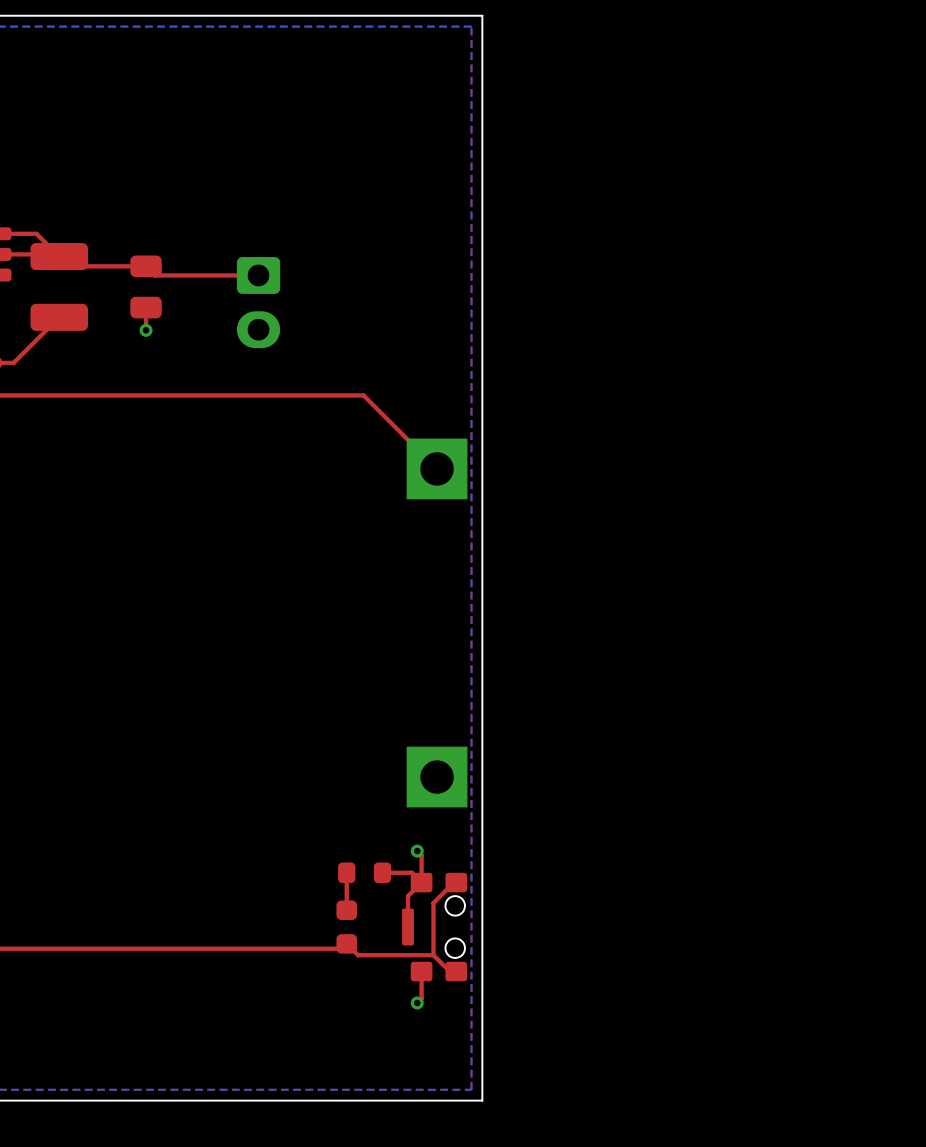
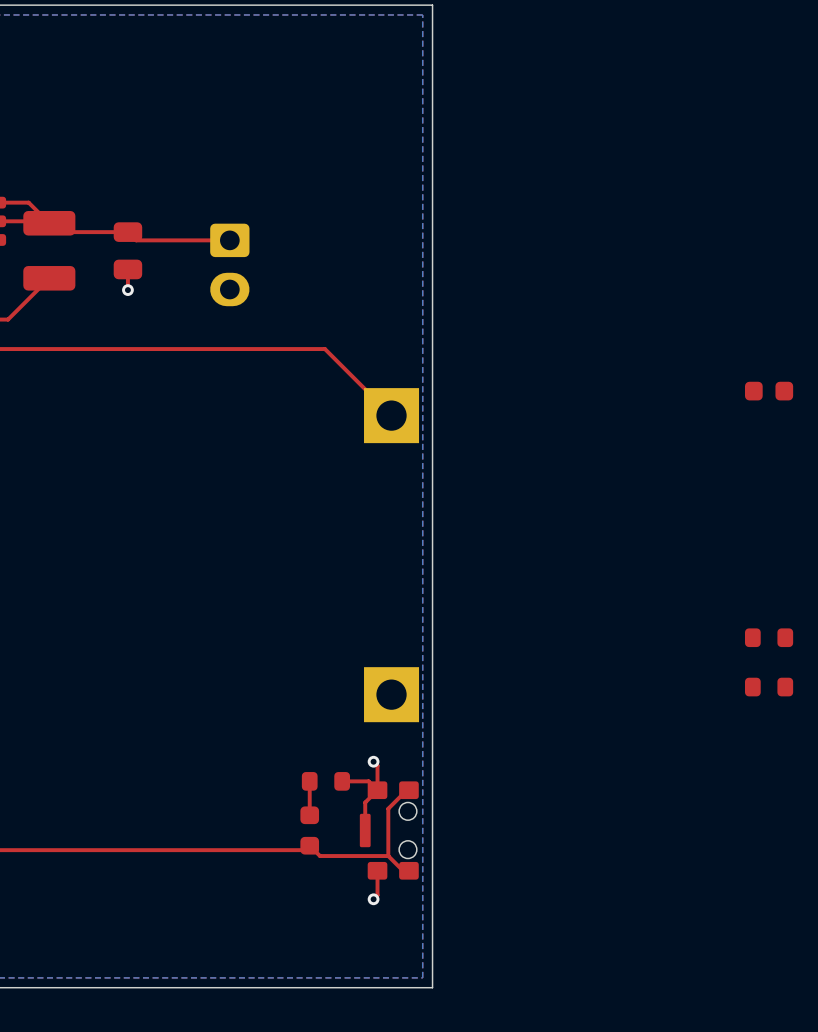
part: none -> (769, 391)
part: none -> (769, 637)
part: none -> (769, 687)

